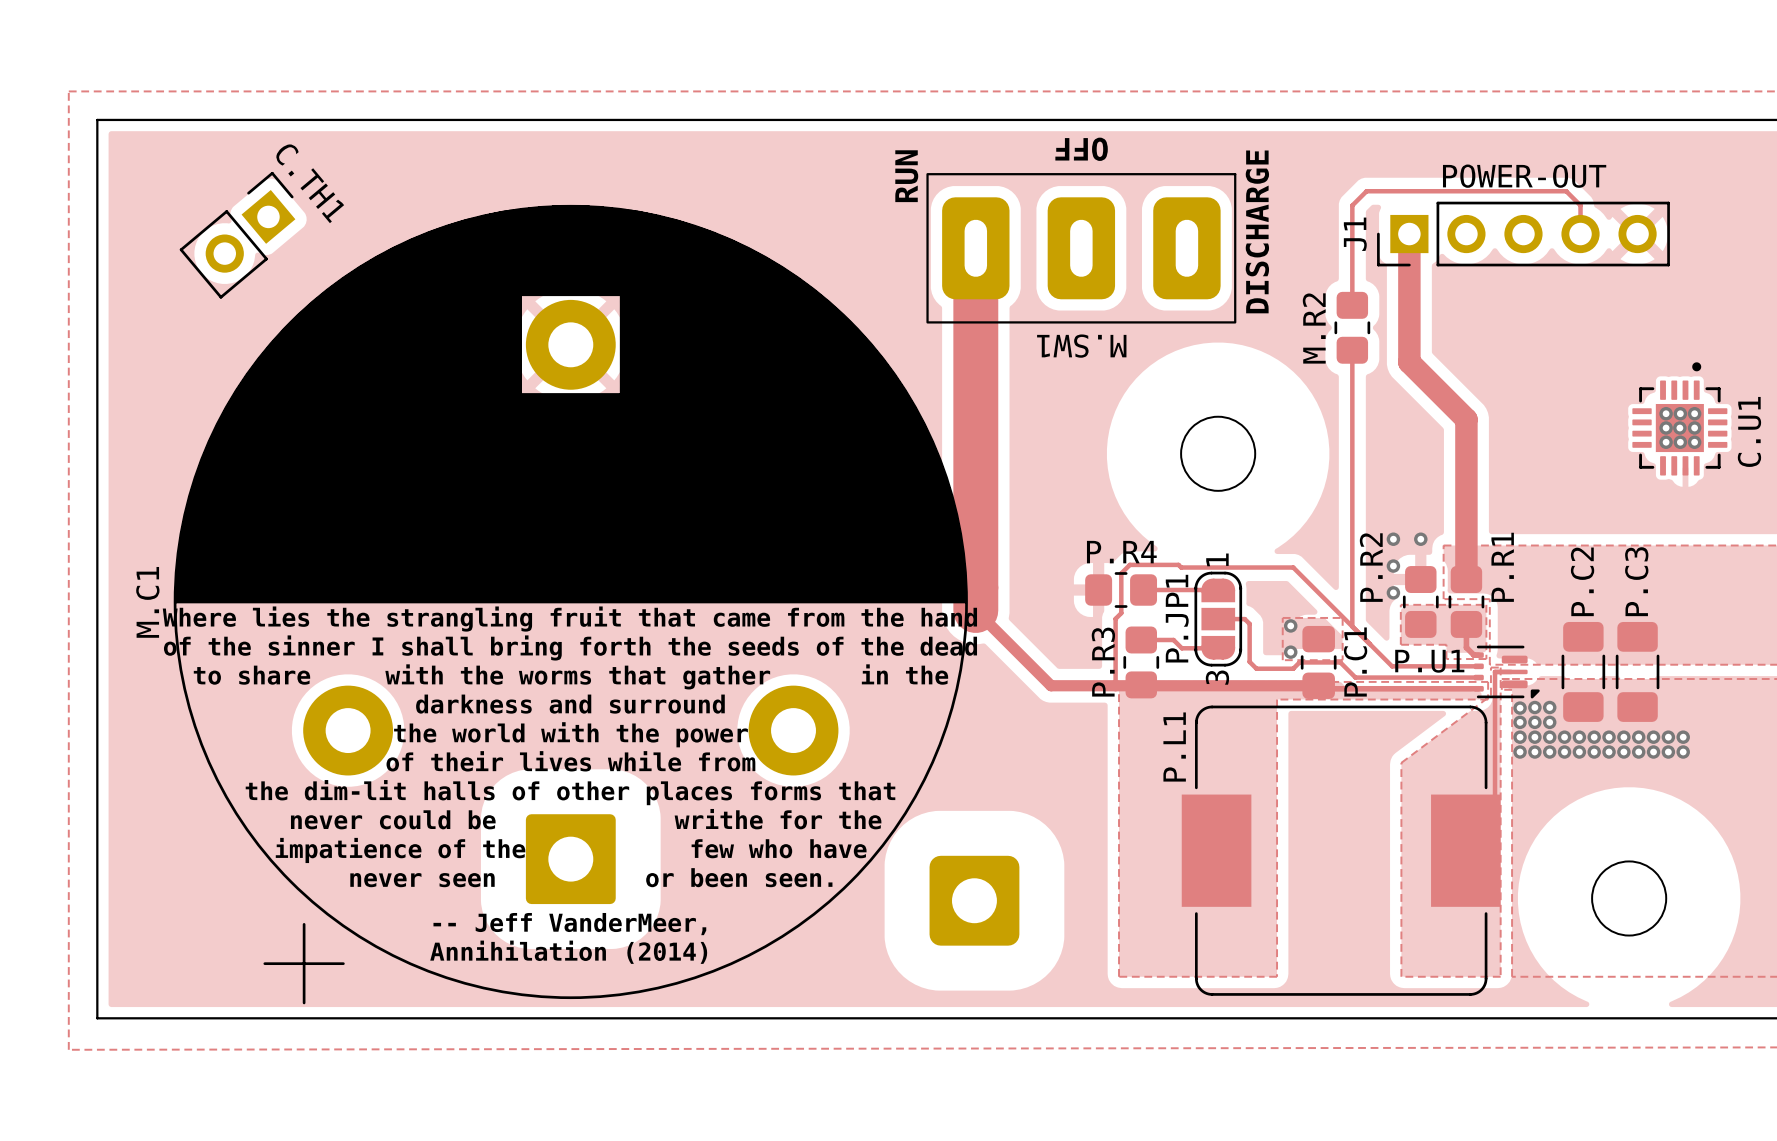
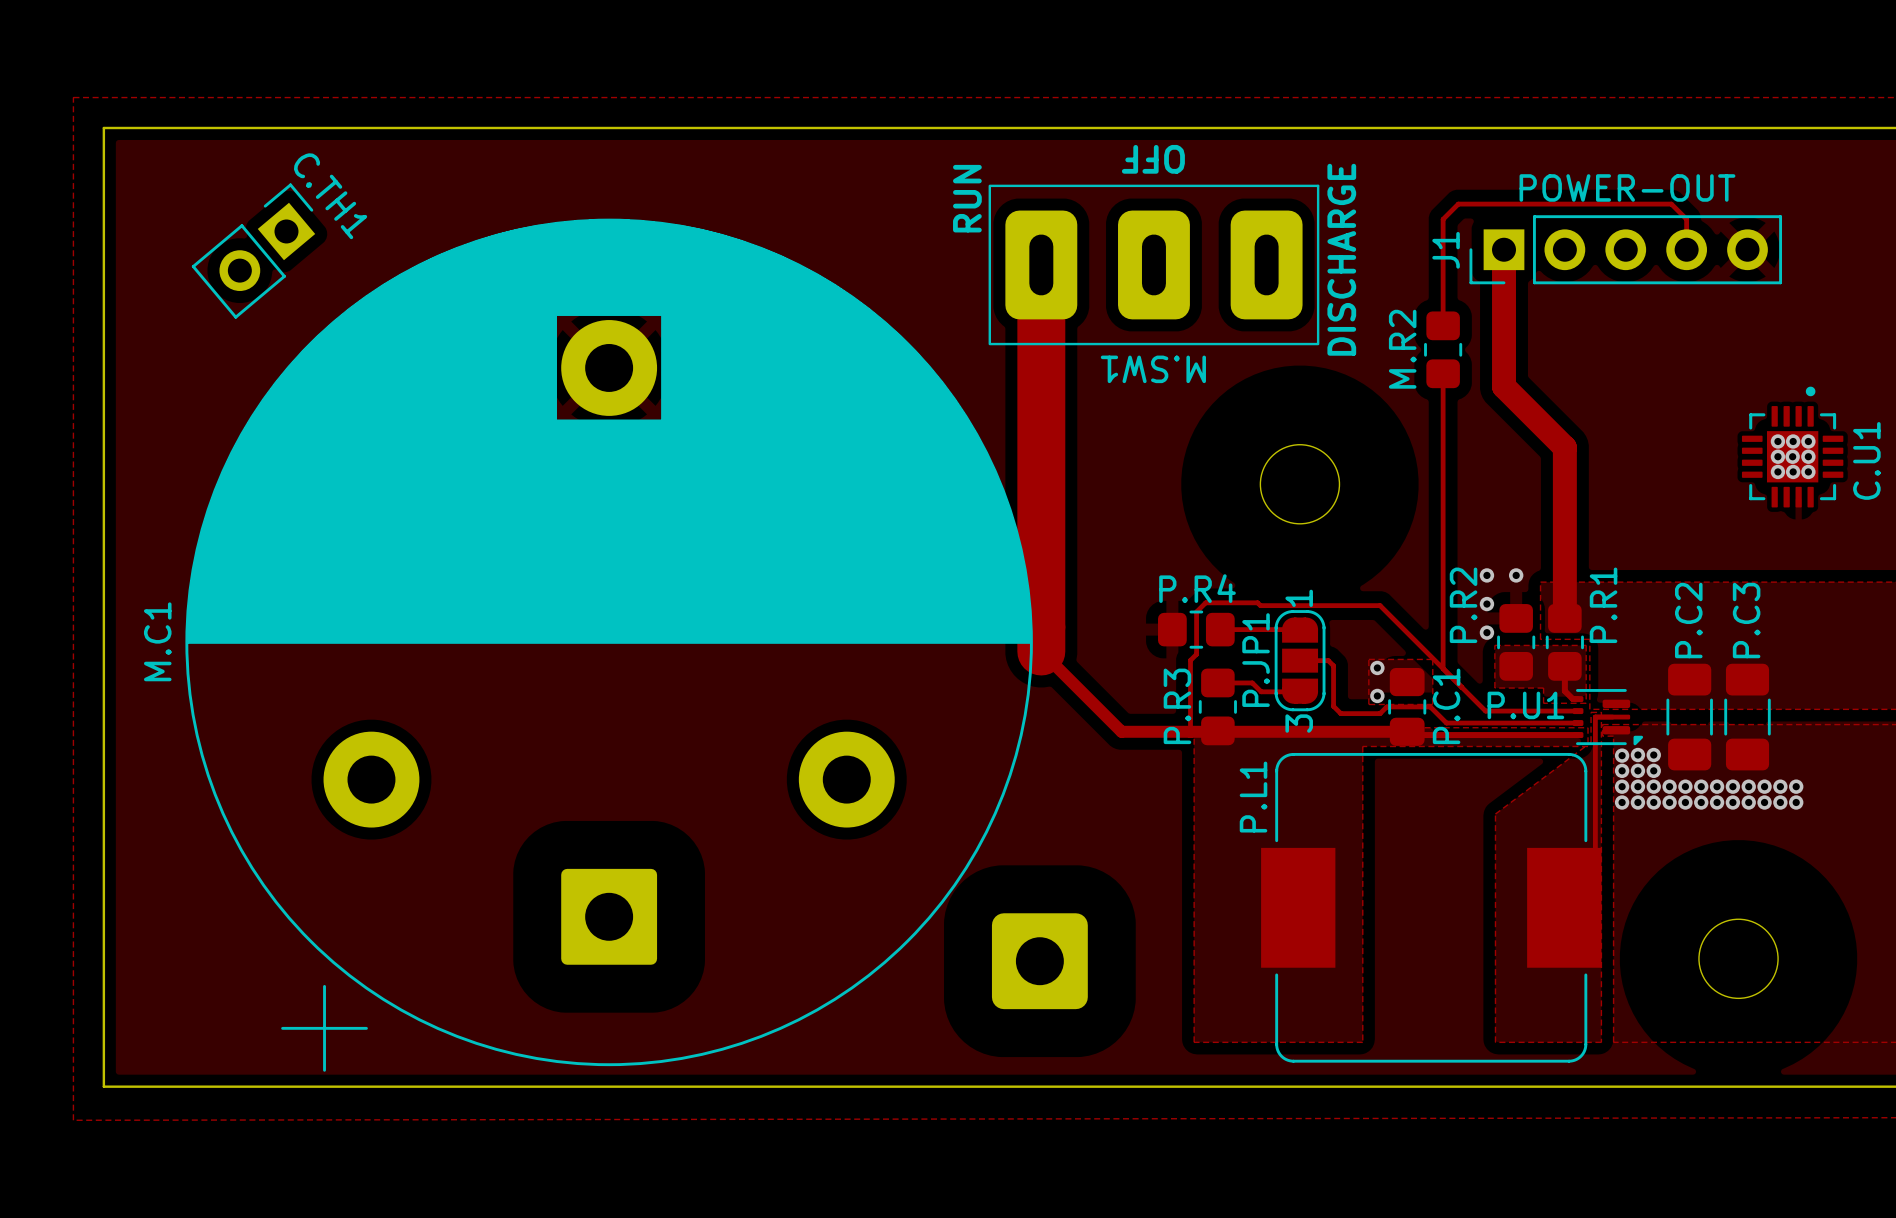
text: Where lies the strangling fruit that came from the hand (569, 619) -> none
text: of the sinner I shall bring forth the seeds of the dead (570, 647) -> none
text: to share with the worms that gather in the (570, 676) -> none
text: darkness and surround (570, 704) -> none
text: the world with the power (570, 734) -> none
text: of their lives while from (570, 761) -> none
text: the dim-lit halls of other places forms that (570, 792) -> none
text: never could be writhe for the (586, 819) -> none
text: impatience of the few who have (571, 850) -> none
text: never seen or been seen. (591, 877) -> none
text: -- Jeff VanderMeer, (569, 924) -> none
text: Annihilation (2014) (568, 952) -> none

